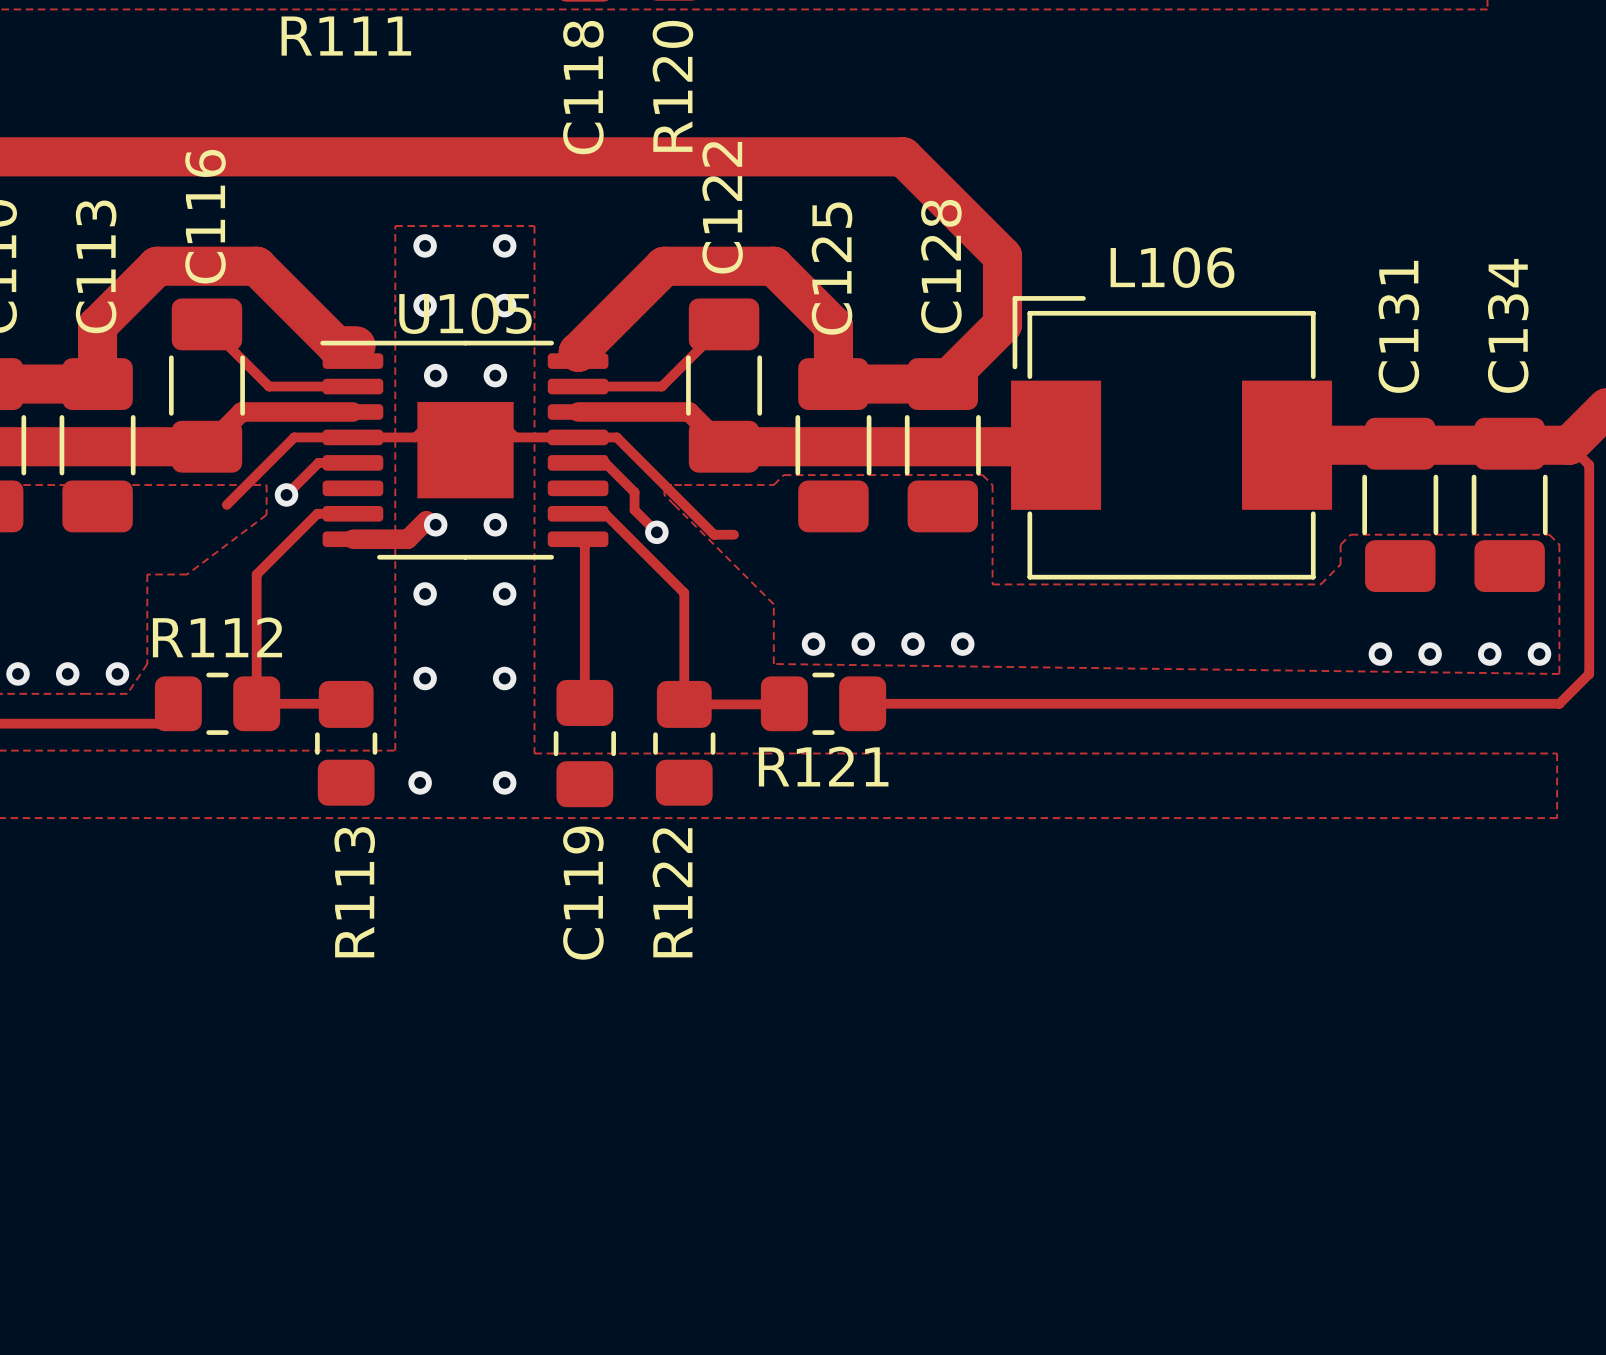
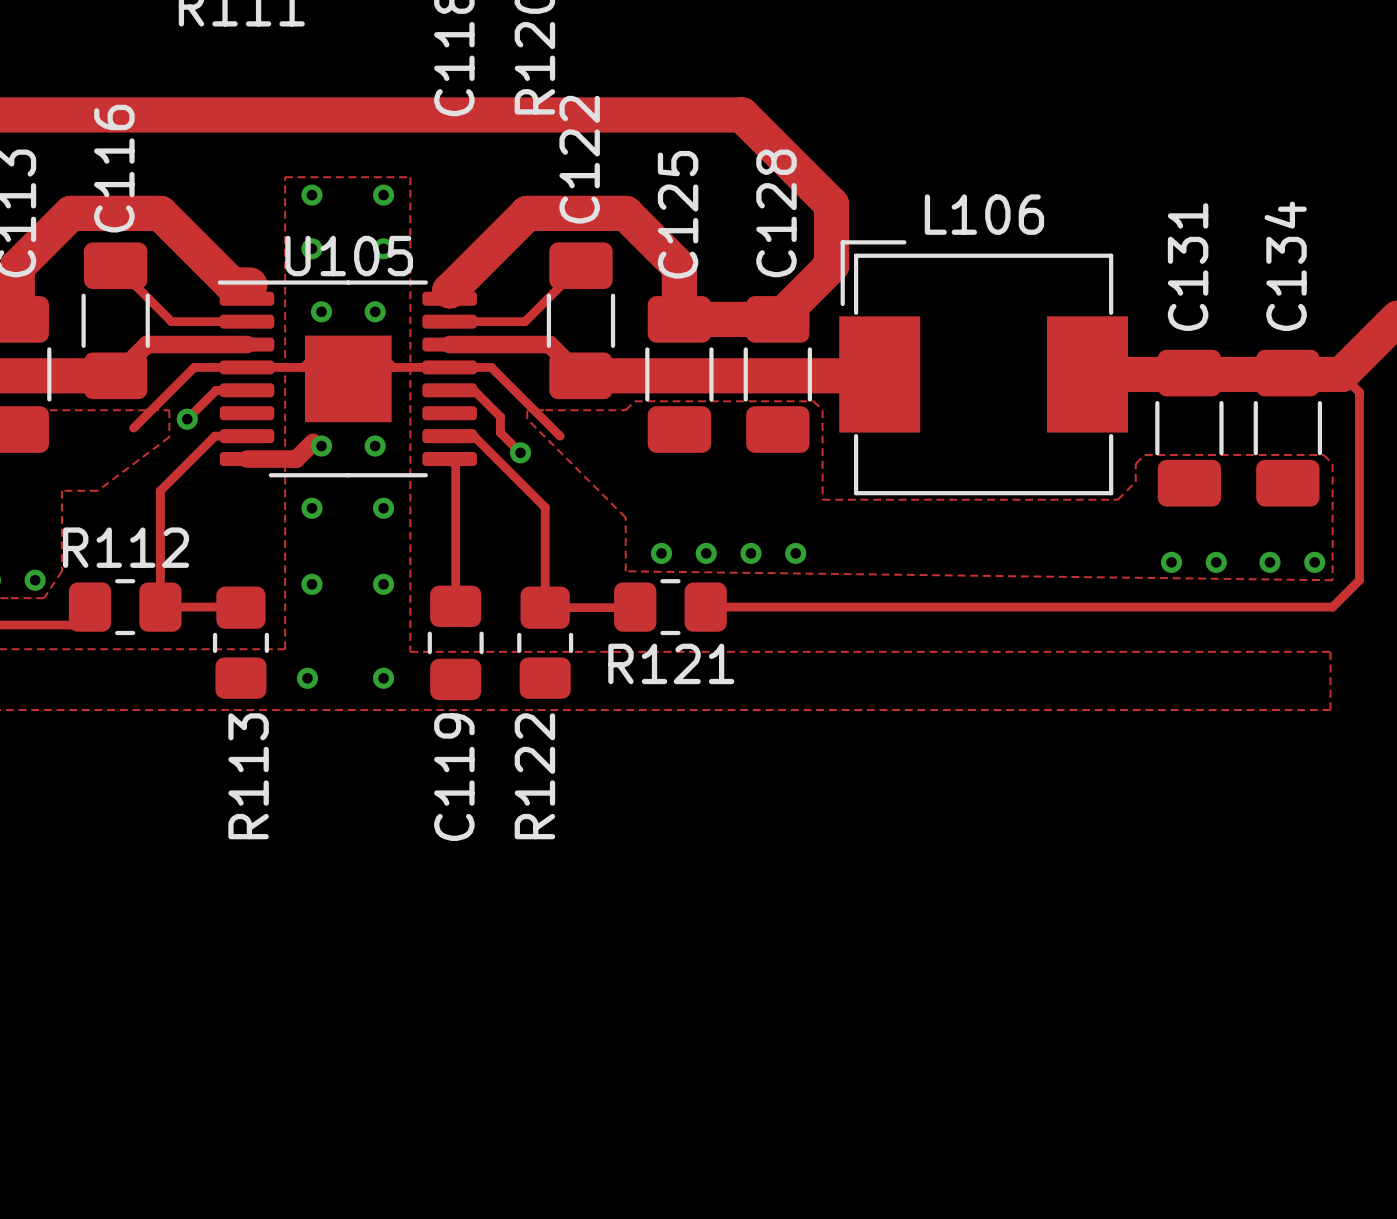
track: (616, 437) (714, 534) (734, 534) -> (484, 367) (491, 367) (560, 436)

